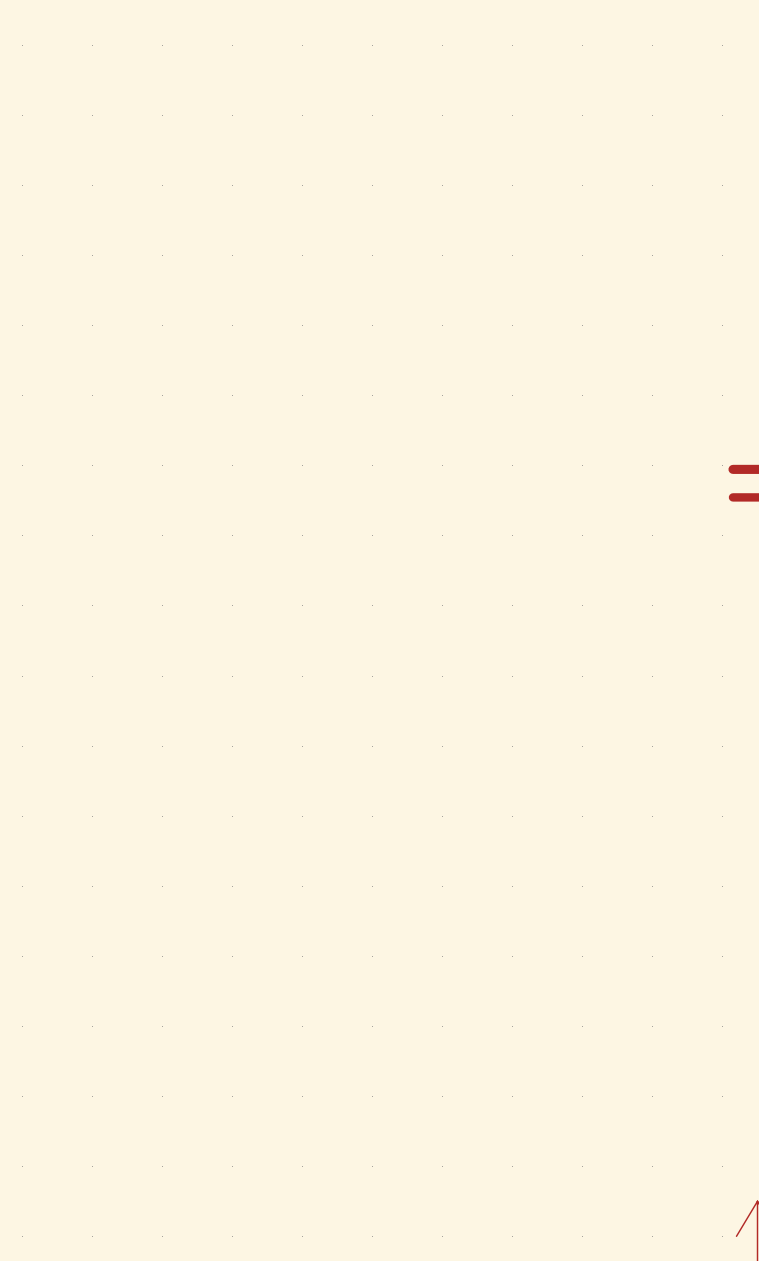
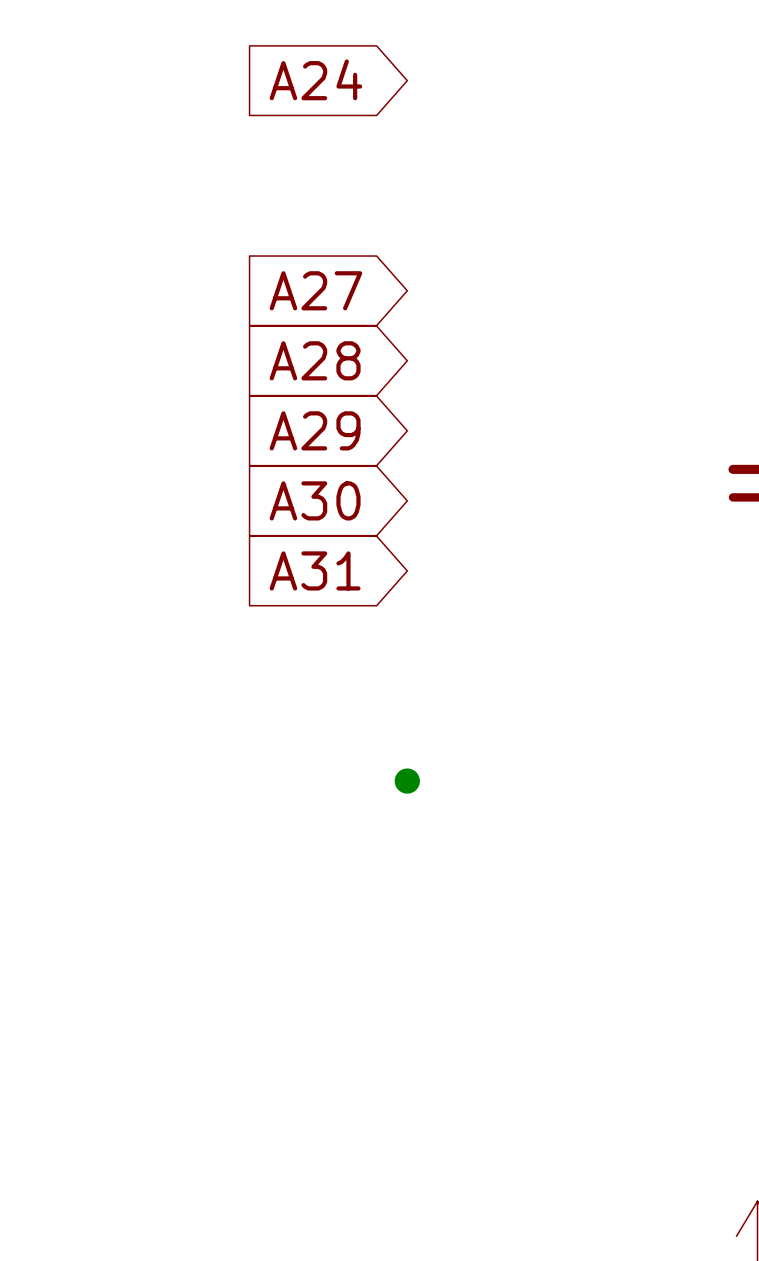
global label: none -> A24 (315, 79)
global label: none -> A27 (315, 290)
global label: none -> A28 (315, 360)
global label: none -> A29 (315, 430)
global label: none -> A30 (315, 500)
global label: none -> A31 (315, 570)
junction: none -> (407, 781)

